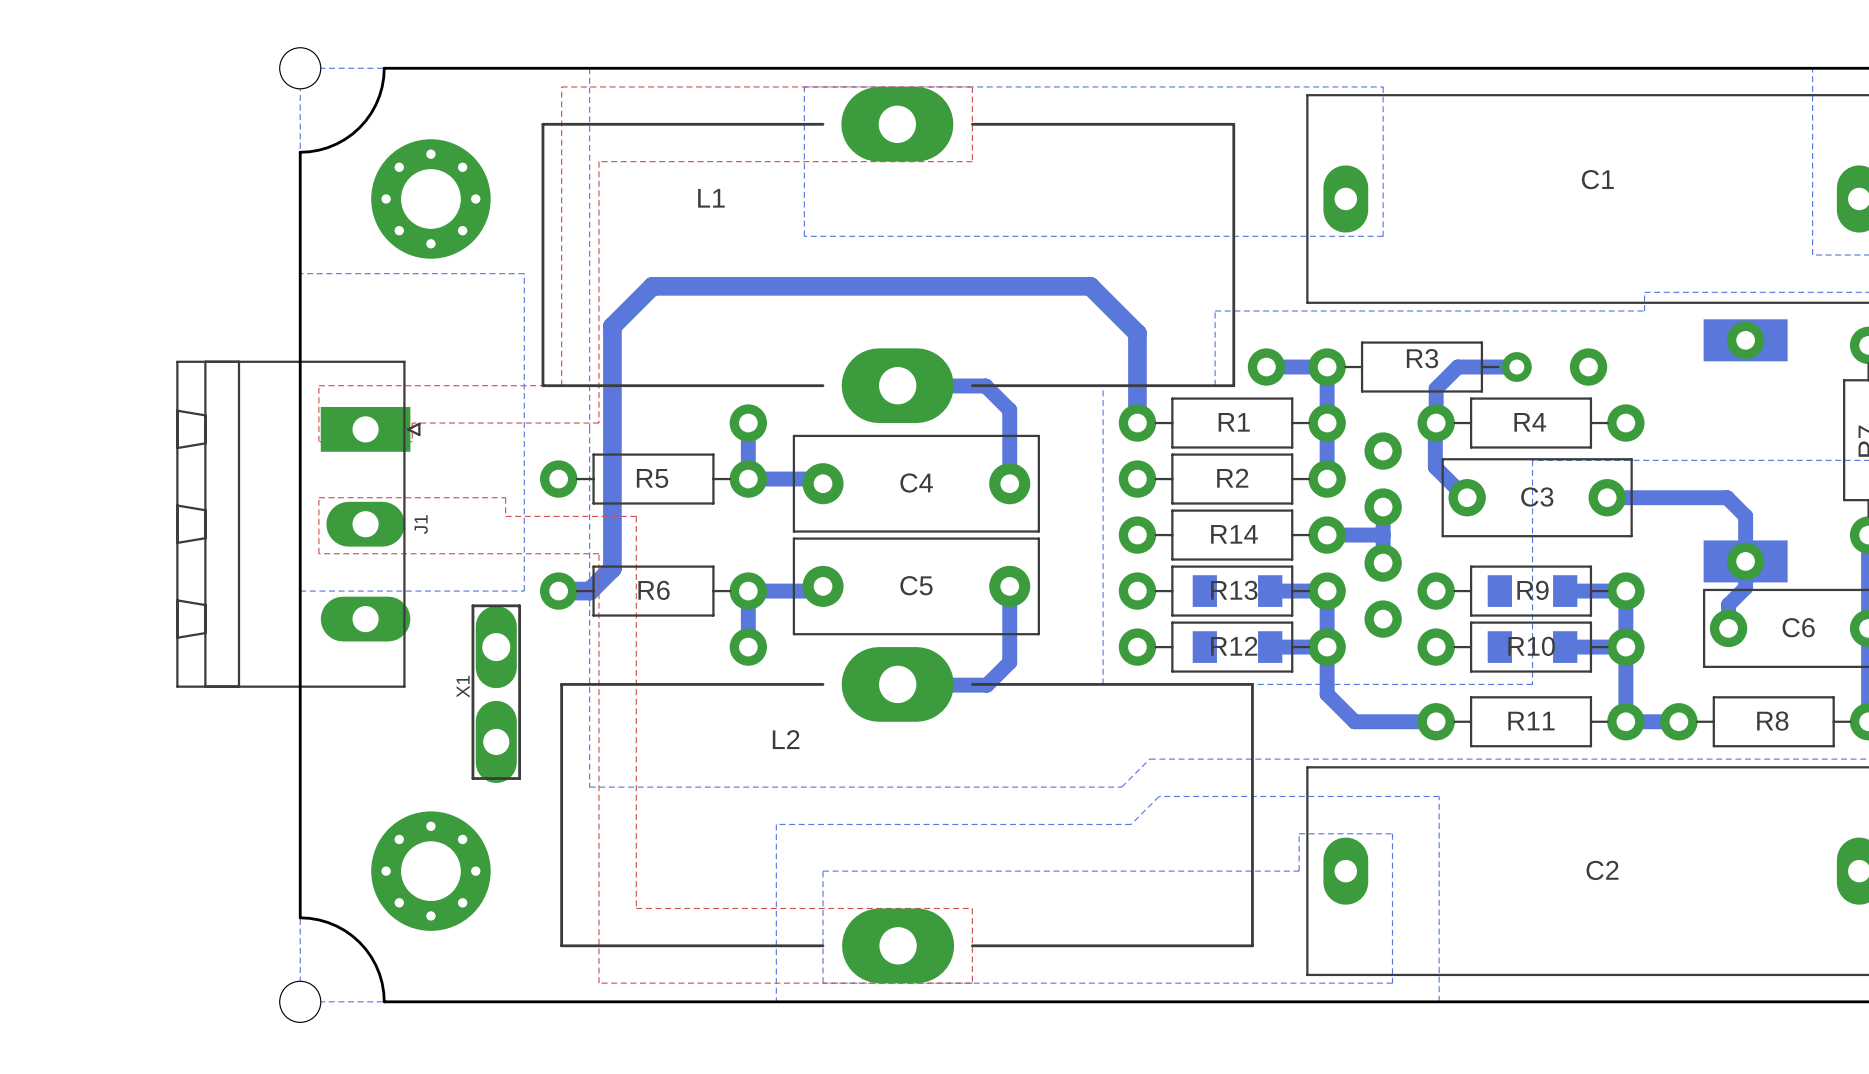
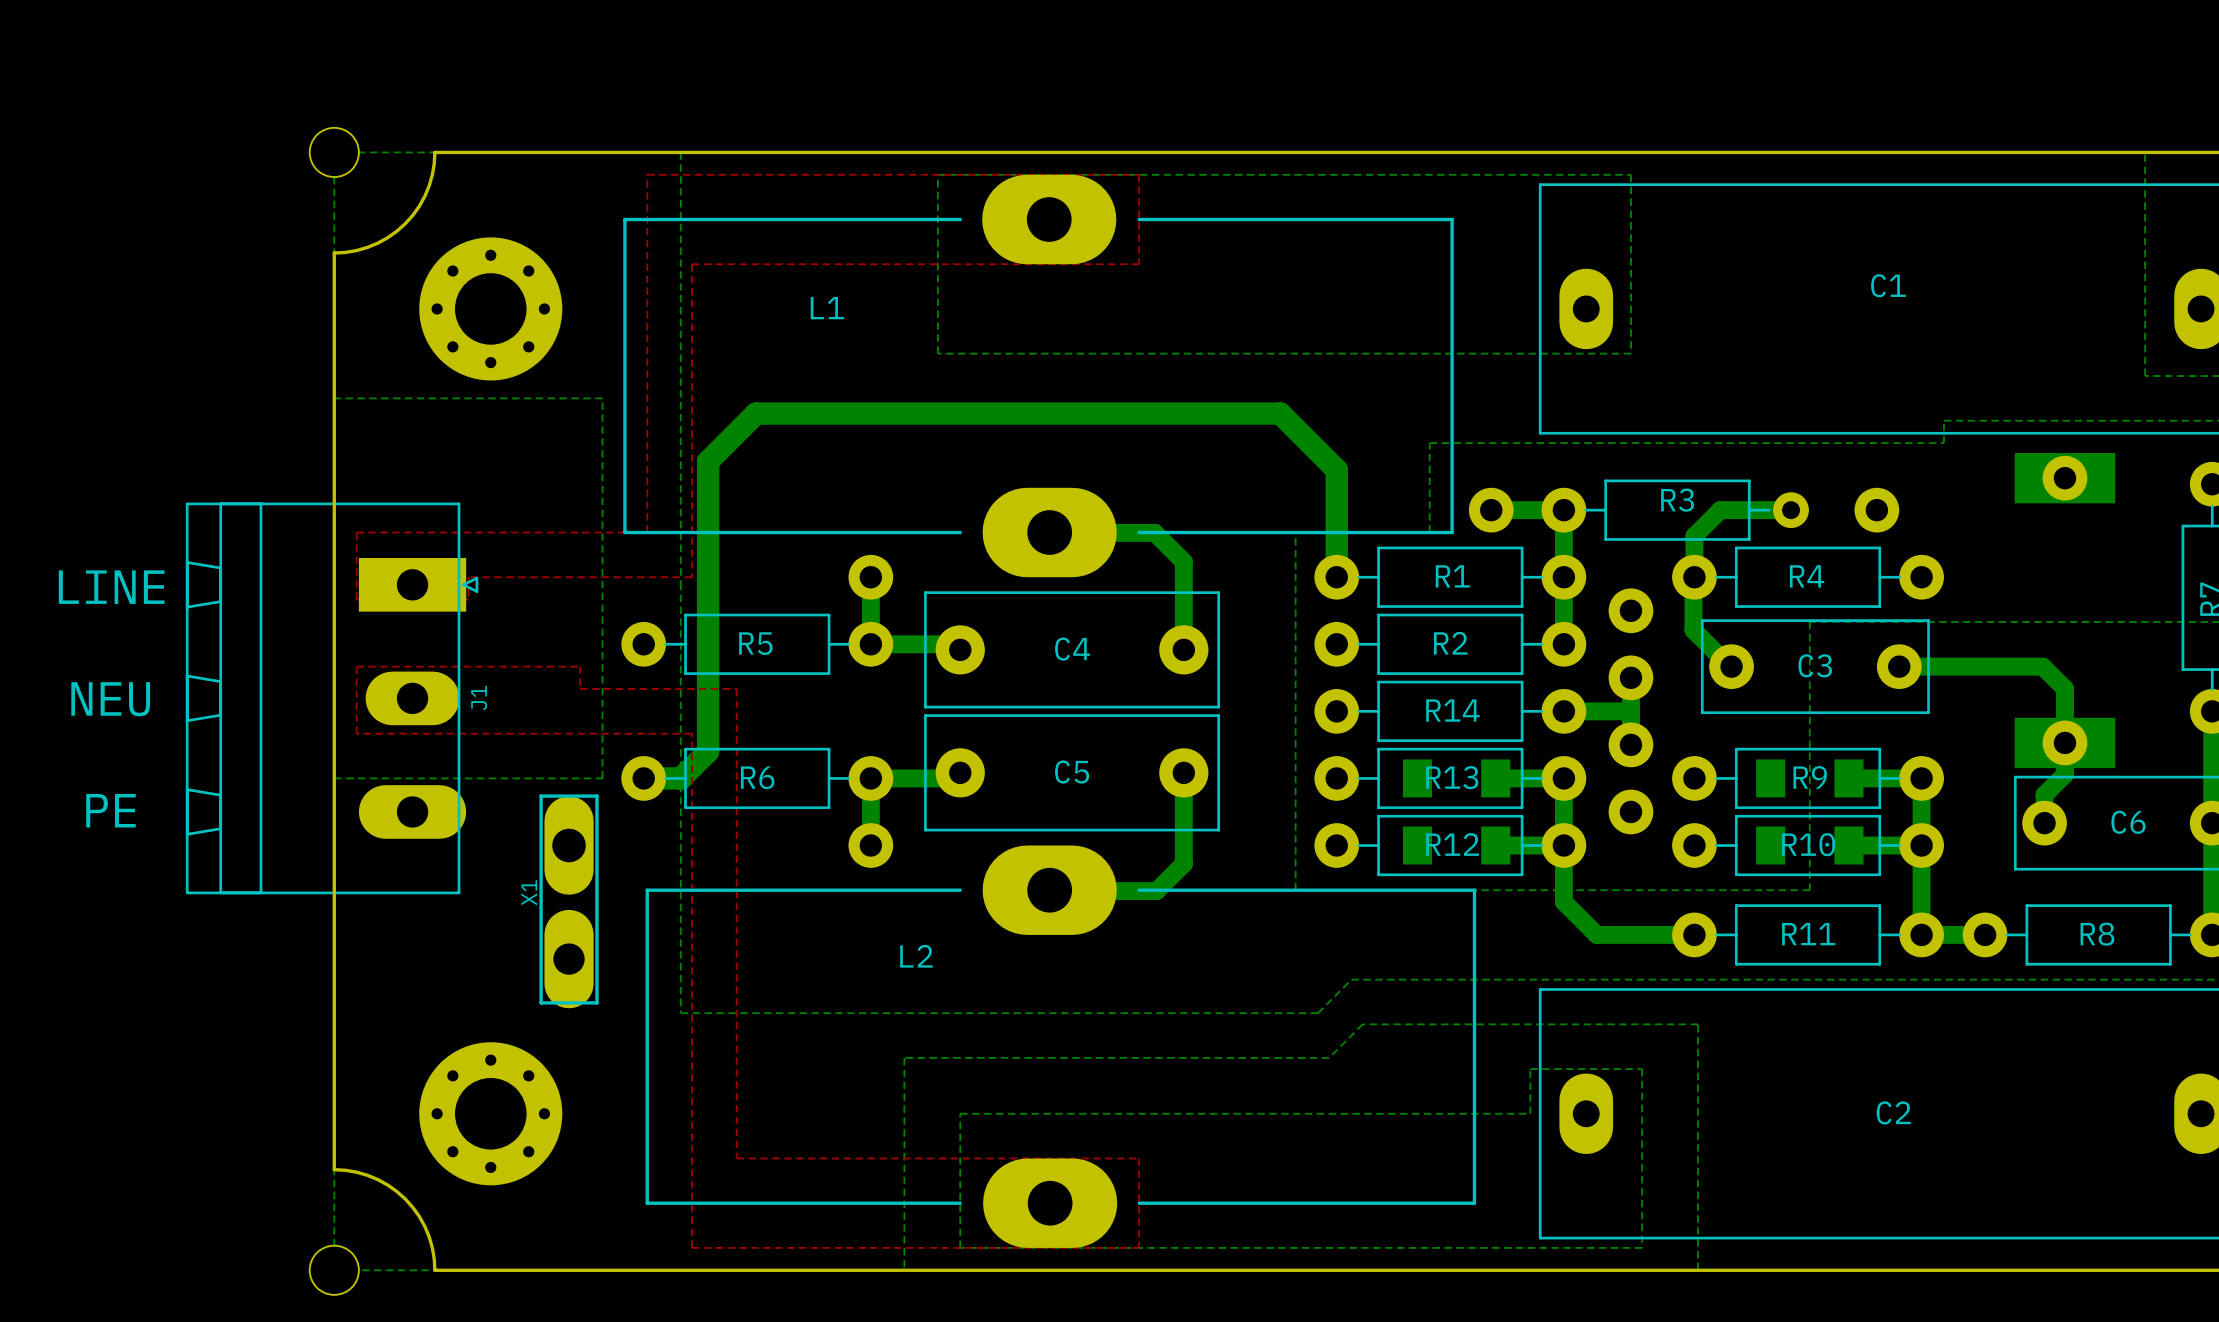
text: none -> LINE (111, 587)
text: none -> NEU (110, 699)
text: none -> PE (110, 810)

